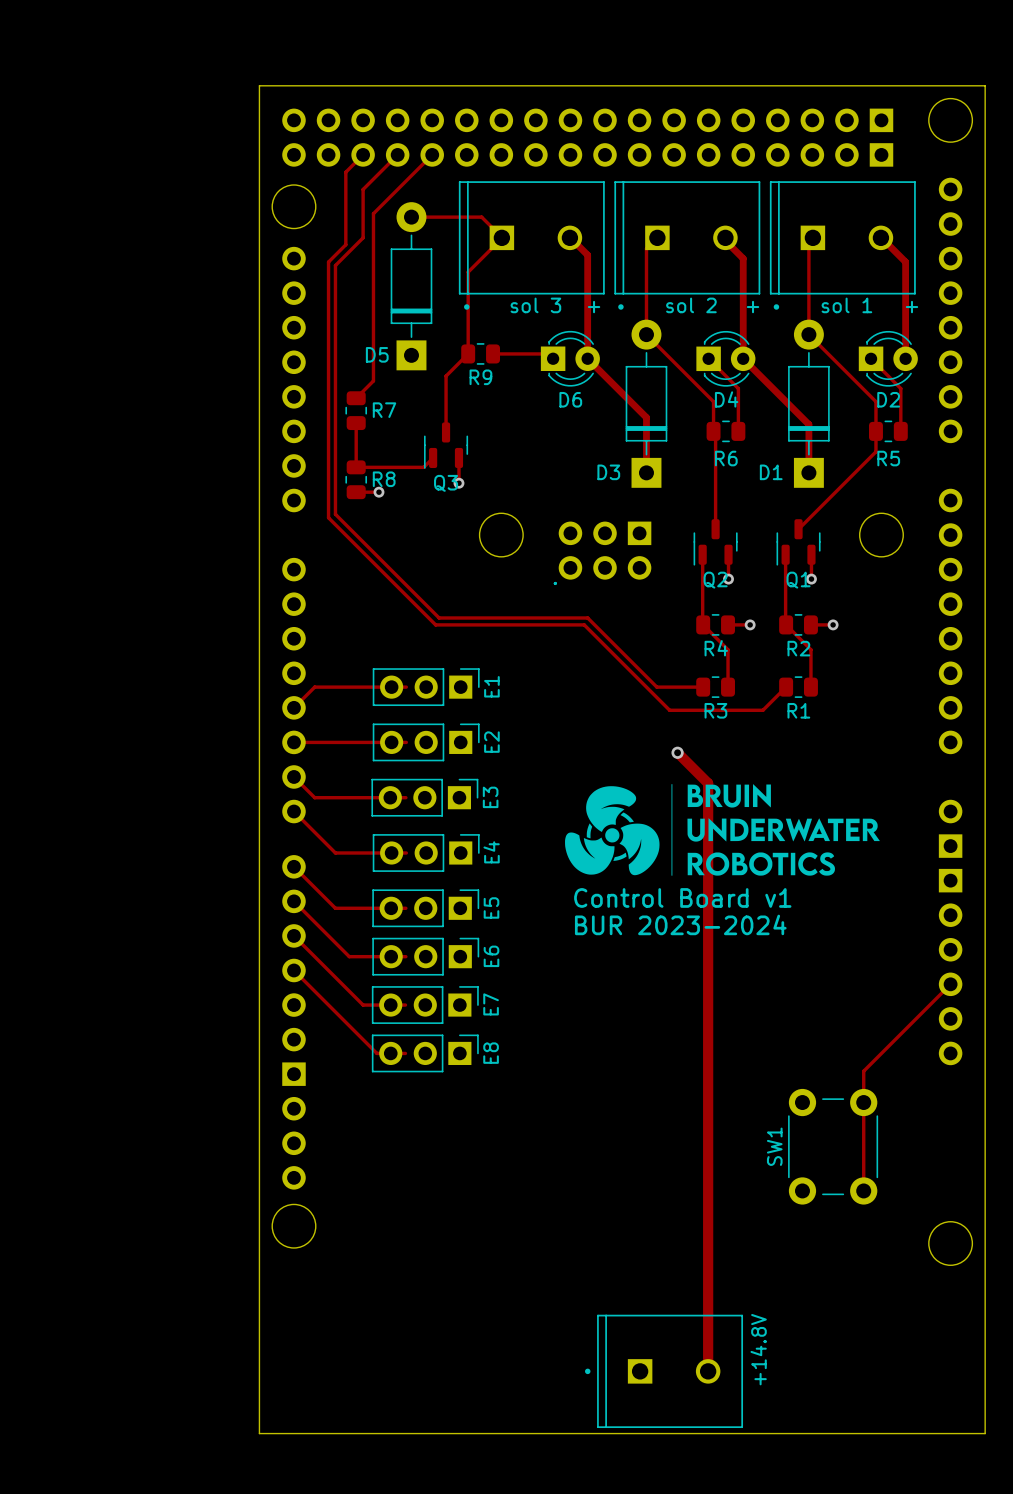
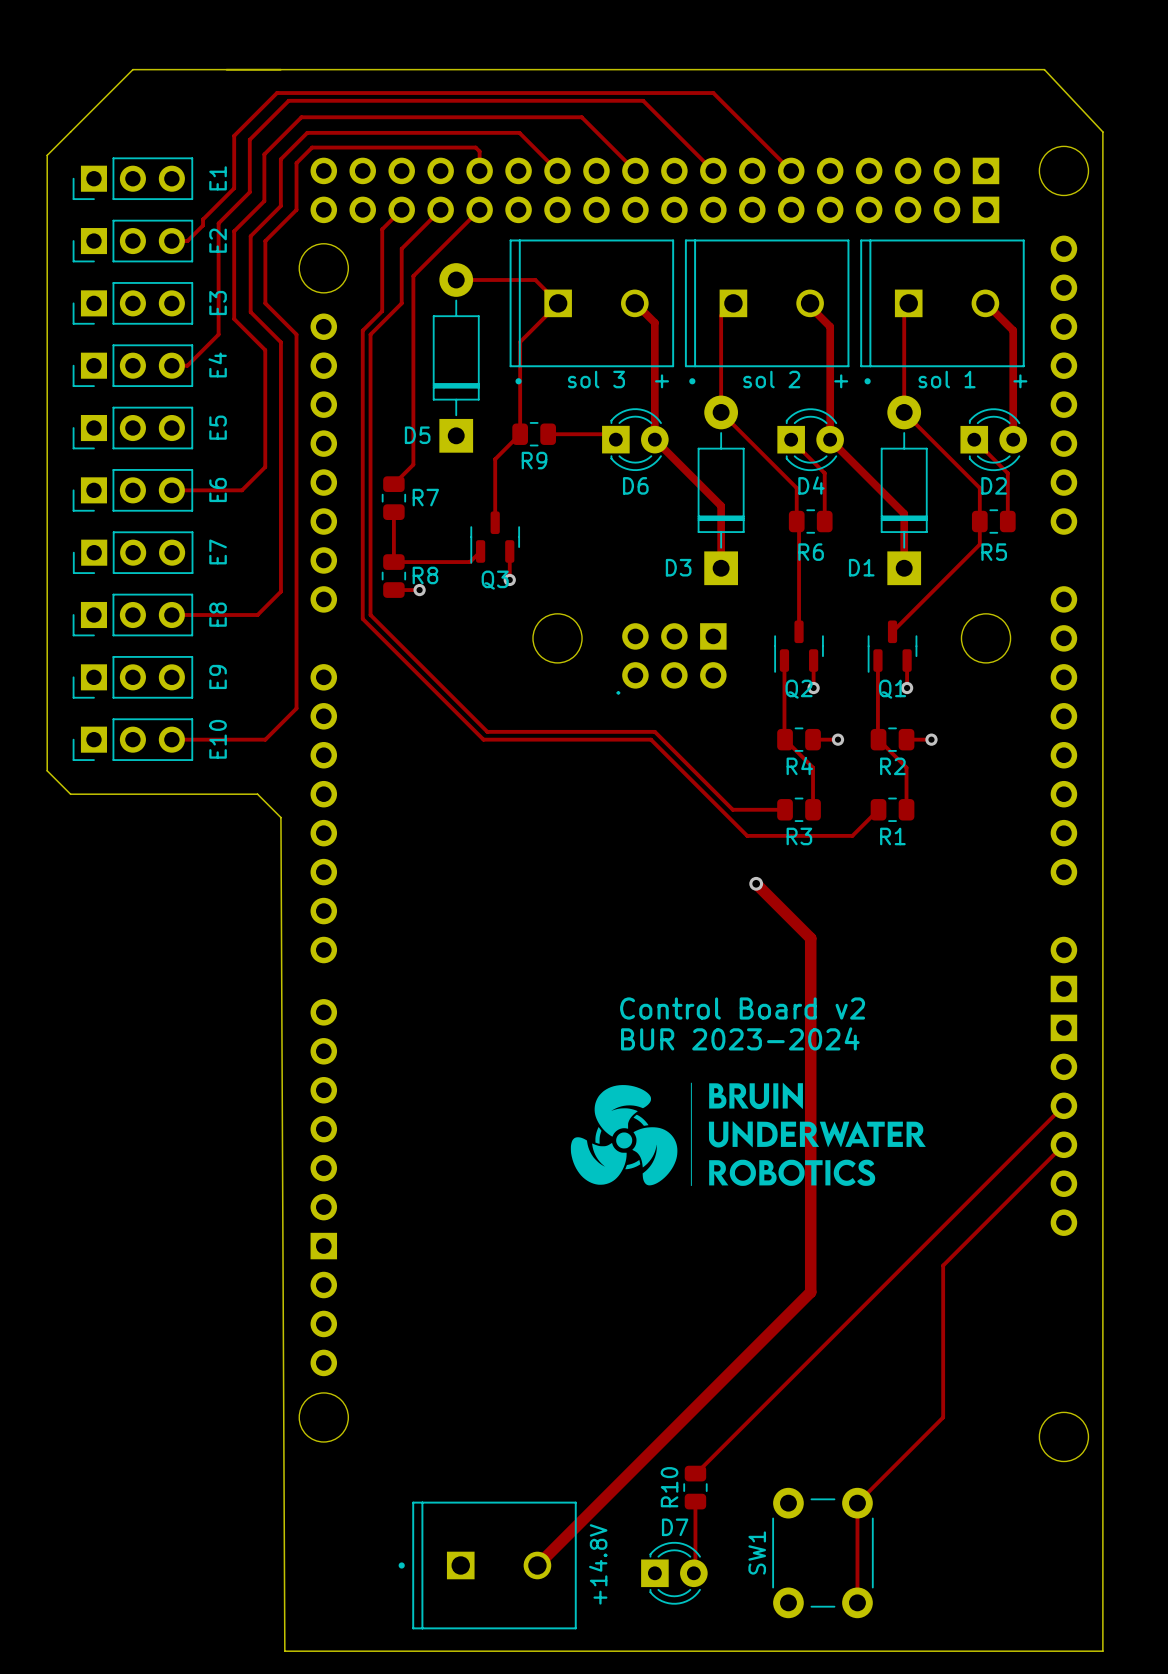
board edge: (985, 85) (259, 85) (259, 1433) -> (1102, 131) (1044, 69) (132, 69) (47, 155) (47, 770) (70, 794) (257, 794) (280, 817) (284, 1651)
track: none -> (479, 170) (479, 151) (475, 147) (312, 147) (296, 163) (296, 209) (265, 241) (265, 303) (296, 334) (296, 708) (265, 739) (171, 739)
track: none -> (557, 170) (519, 132) (307, 132) (280, 159) (280, 206) (250, 236) (250, 312) (280, 342) (280, 591) (257, 615) (171, 615)
track: none -> (635, 170) (581, 117) (301, 117) (264, 154) (264, 201) (234, 231) (234, 319) (265, 350) (265, 467) (241, 490) (171, 490)
track: none -> (713, 170) (643, 100) (288, 100) (249, 139) (249, 192) (218, 223) (218, 334) (187, 365) (171, 365)
track: none -> (791, 170) (713, 93) (277, 93) (234, 135) (234, 188) (203, 219) (203, 225) (187, 241) (171, 241)
E9: none -> (132, 677)
E10: none -> (132, 739)
track: (406, 687) (314, 687) (293, 707) -> none
E1 rotation: 0° (426, 687) -> 180° (132, 178)
E1 position: (426, 687) -> (132, 178)
track: (293, 742) (406, 742) -> none
E2 rotation: 0° (426, 742) -> 180° (132, 241)
E2 position: (426, 742) -> (132, 241)
track: (293, 776) (314, 797) (405, 797) -> none
track: (708, 783) (708, 1371) -> (790, 918) (810, 938) (810, 1292) (537, 1565)
E3 rotation: 0° (424, 797) -> 180° (132, 303)
E3 position: (424, 797) -> (132, 303)
track: (293, 811) (335, 853) (406, 853) -> none
drawing position: (722, 829) -> (748, 1134)
E4 rotation: 0° (426, 853) -> 180° (132, 365)
E4 position: (426, 853) -> (132, 365)
track: (293, 866) (335, 908) (405, 908) -> none
text: Control Board v1 (682, 897) -> Control Board v2 (742, 1008)
track: (293, 901) (349, 956) (405, 956) -> none
E5 rotation: 0° (425, 908) -> 180° (132, 428)
E5 position: (425, 908) -> (132, 428)
text position: BUR 2023-2024 (680, 924) -> BUR 2023-2024 (740, 1038)
track: (293, 935) (363, 1005) (405, 1005) -> none
track: none -> (1063, 1105) (695, 1473)
E6 rotation: 0° (425, 956) -> 180° (132, 490)
E6 position: (425, 956) -> (132, 490)
track: (293, 970) (376, 1053) (405, 1053) -> none
E7 rotation: 0° (425, 1005) -> 180° (133, 552)
E7 position: (425, 1005) -> (133, 552)
E8 rotation: 0° (425, 1053) -> 180° (132, 615)
E8 position: (425, 1053) -> (132, 615)
track: (863, 1071) (863, 1180) -> (965, 1242) (943, 1265) (943, 1417) (857, 1503) (857, 1602)
SW1 position: (833, 1146) -> (822, 1553)
R10: none -> (695, 1487)
track: none -> (695, 1501) (695, 1571) (693, 1573)
text position: +14.8V (758, 1349) -> +14.8V (598, 1564)
D7: none -> (674, 1573)
part position: (664, 1371) -> (487, 1565)

